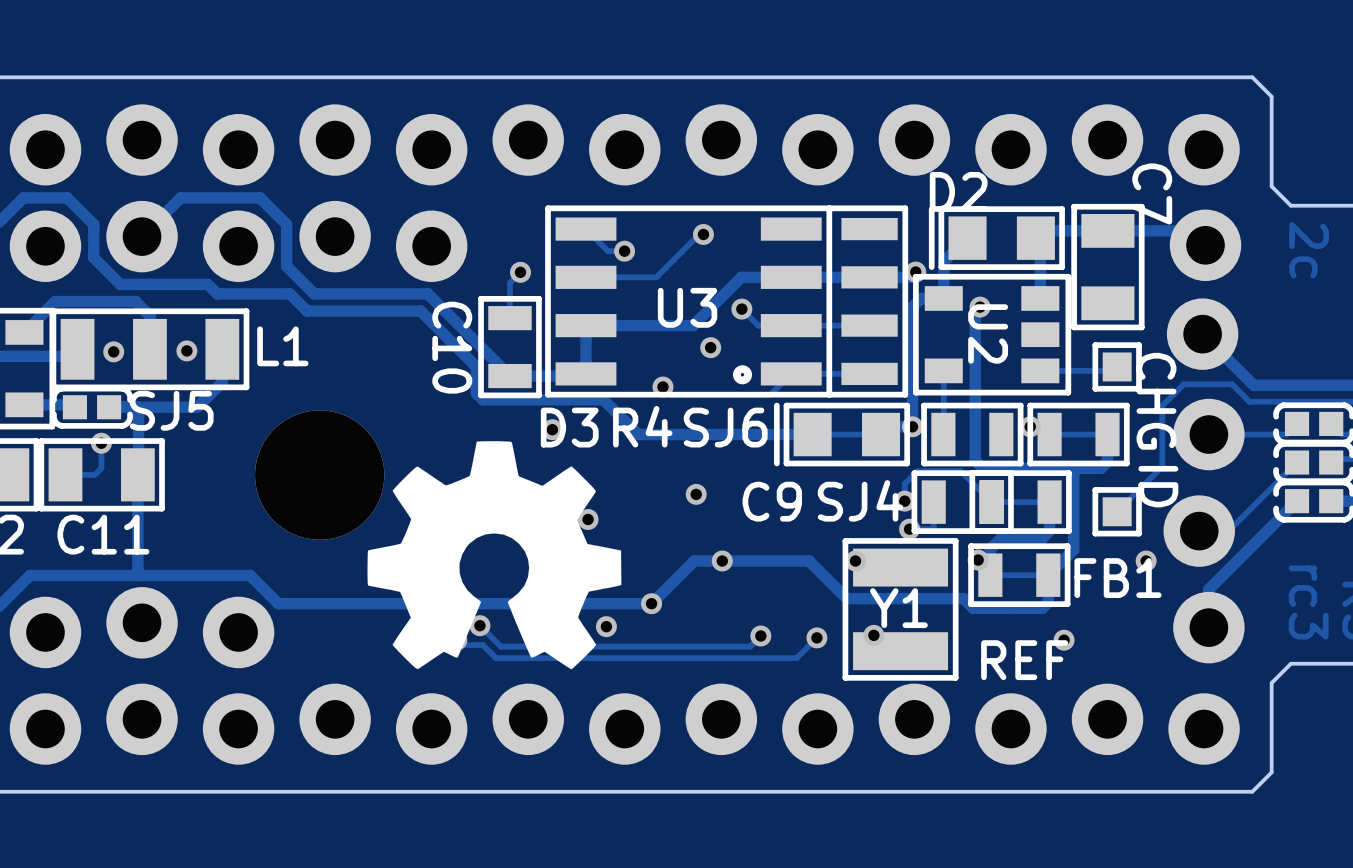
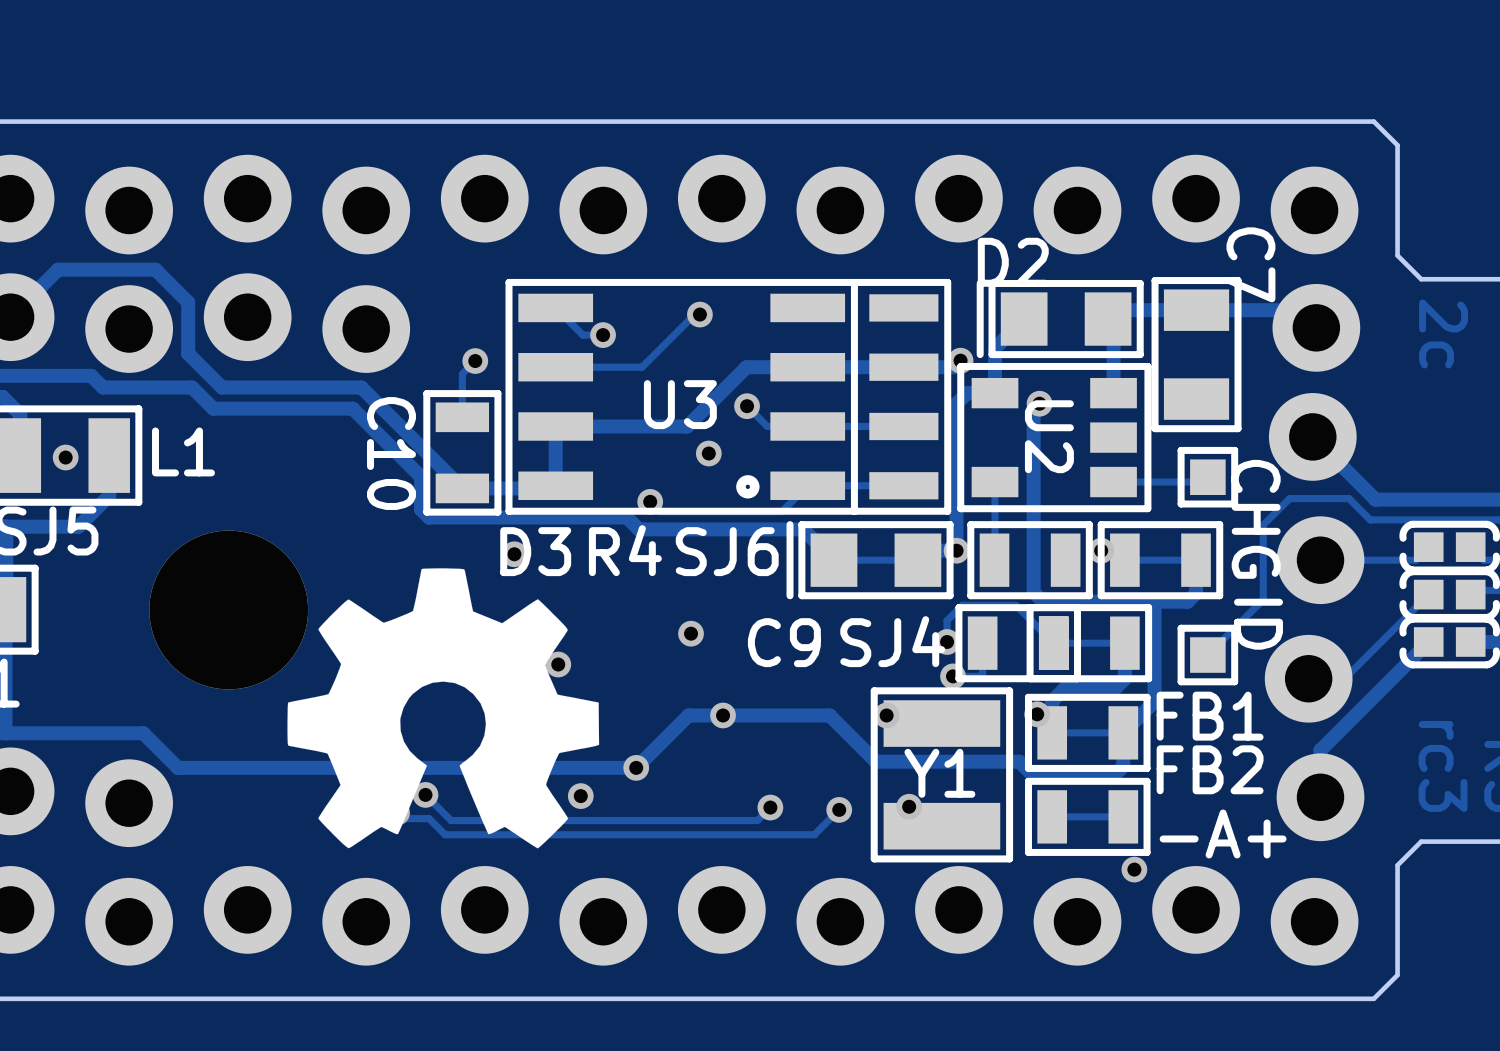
track: (603, 399) (638, 434) (812, 434) -> (577, 517) (627, 517) (638, 529) (803, 529) (834, 560)
via: (1146, 561) -> none
FB1 name position: FB1 (1117, 578) -> FB1 (1210, 716)
via position: (1064, 640) -> (1134, 869)
FB2: none -> (1087, 816)
text: none -> -A+ (1223, 833)
text: REF (1024, 660) -> none

